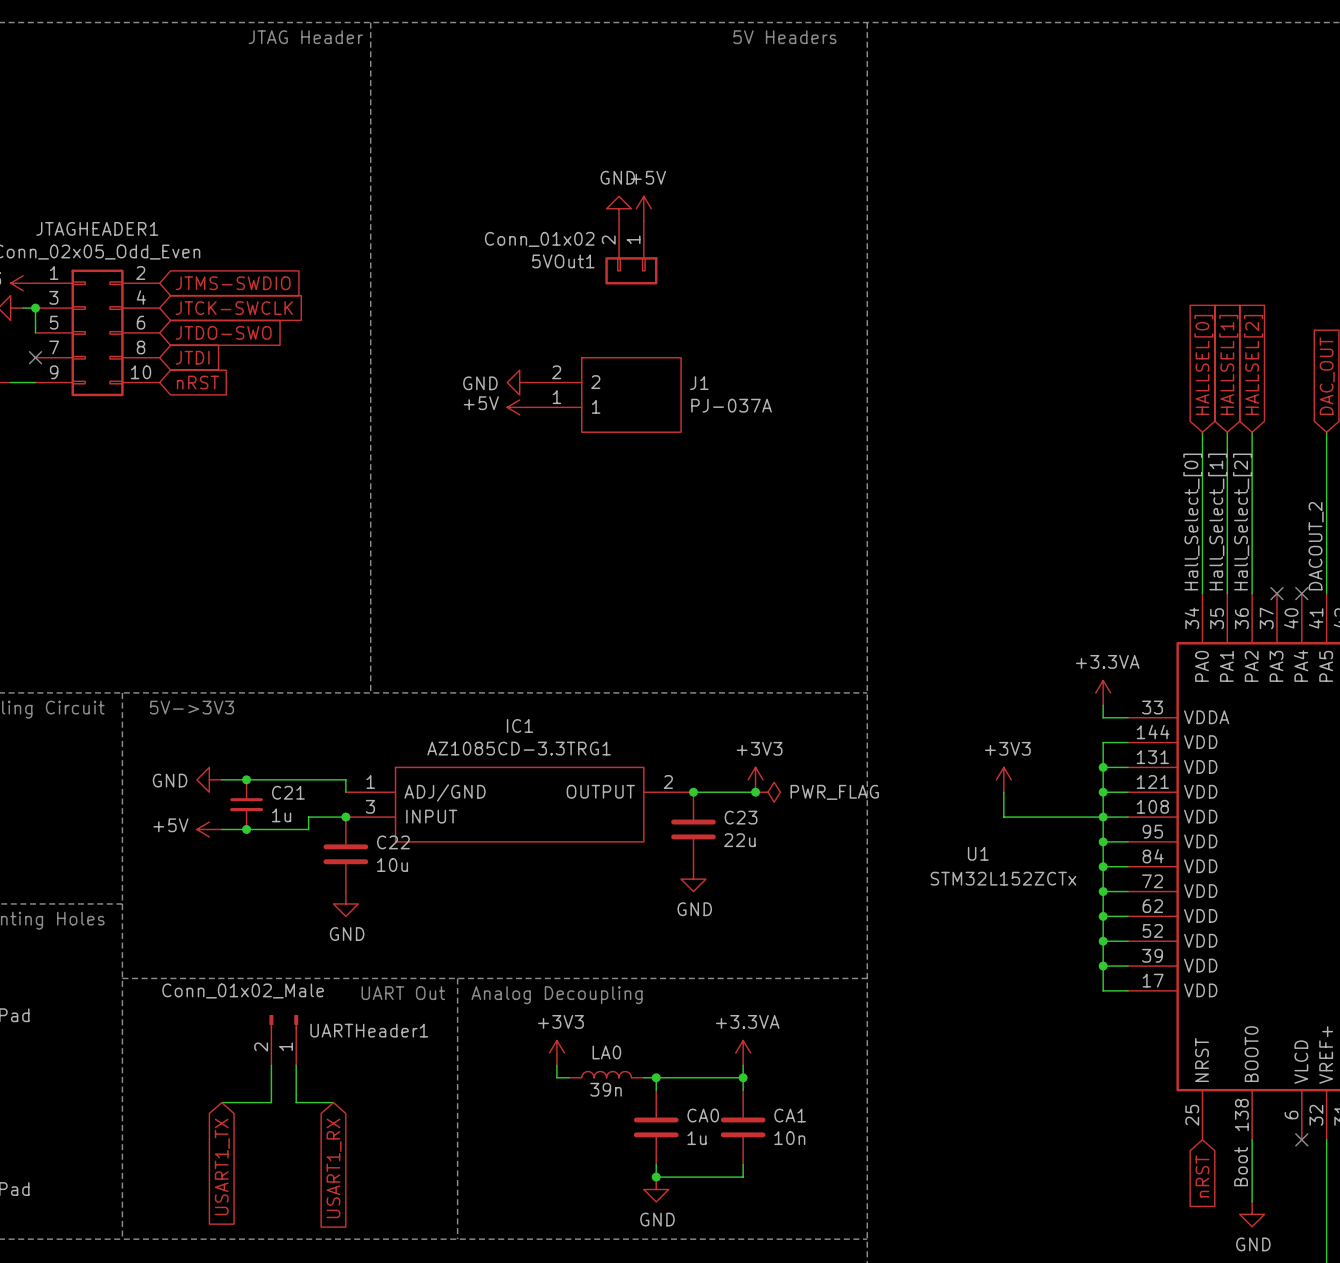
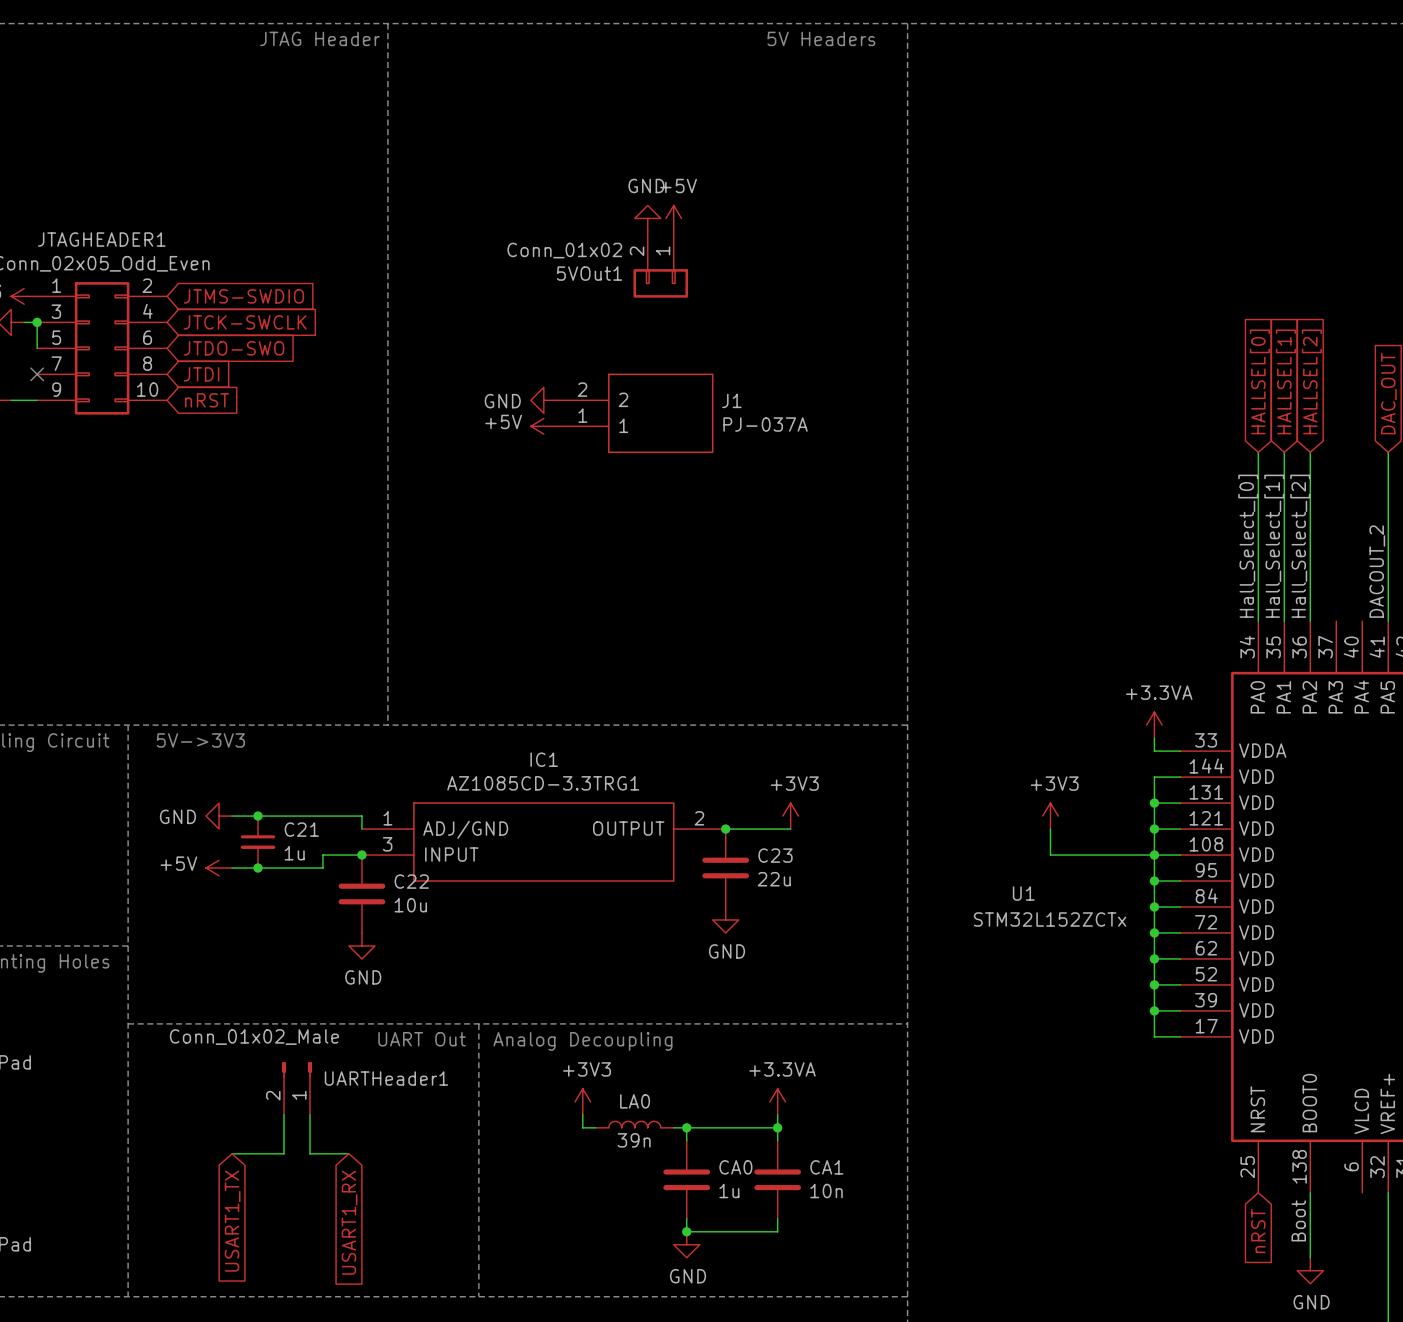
no-connect mark: (1276, 593) -> none
no-connect mark: (1301, 593) -> none
junction: (755, 792) -> none
power symbol: PWR_FLAG (767, 792) -> none
no-connect mark: (1301, 1139) -> none

